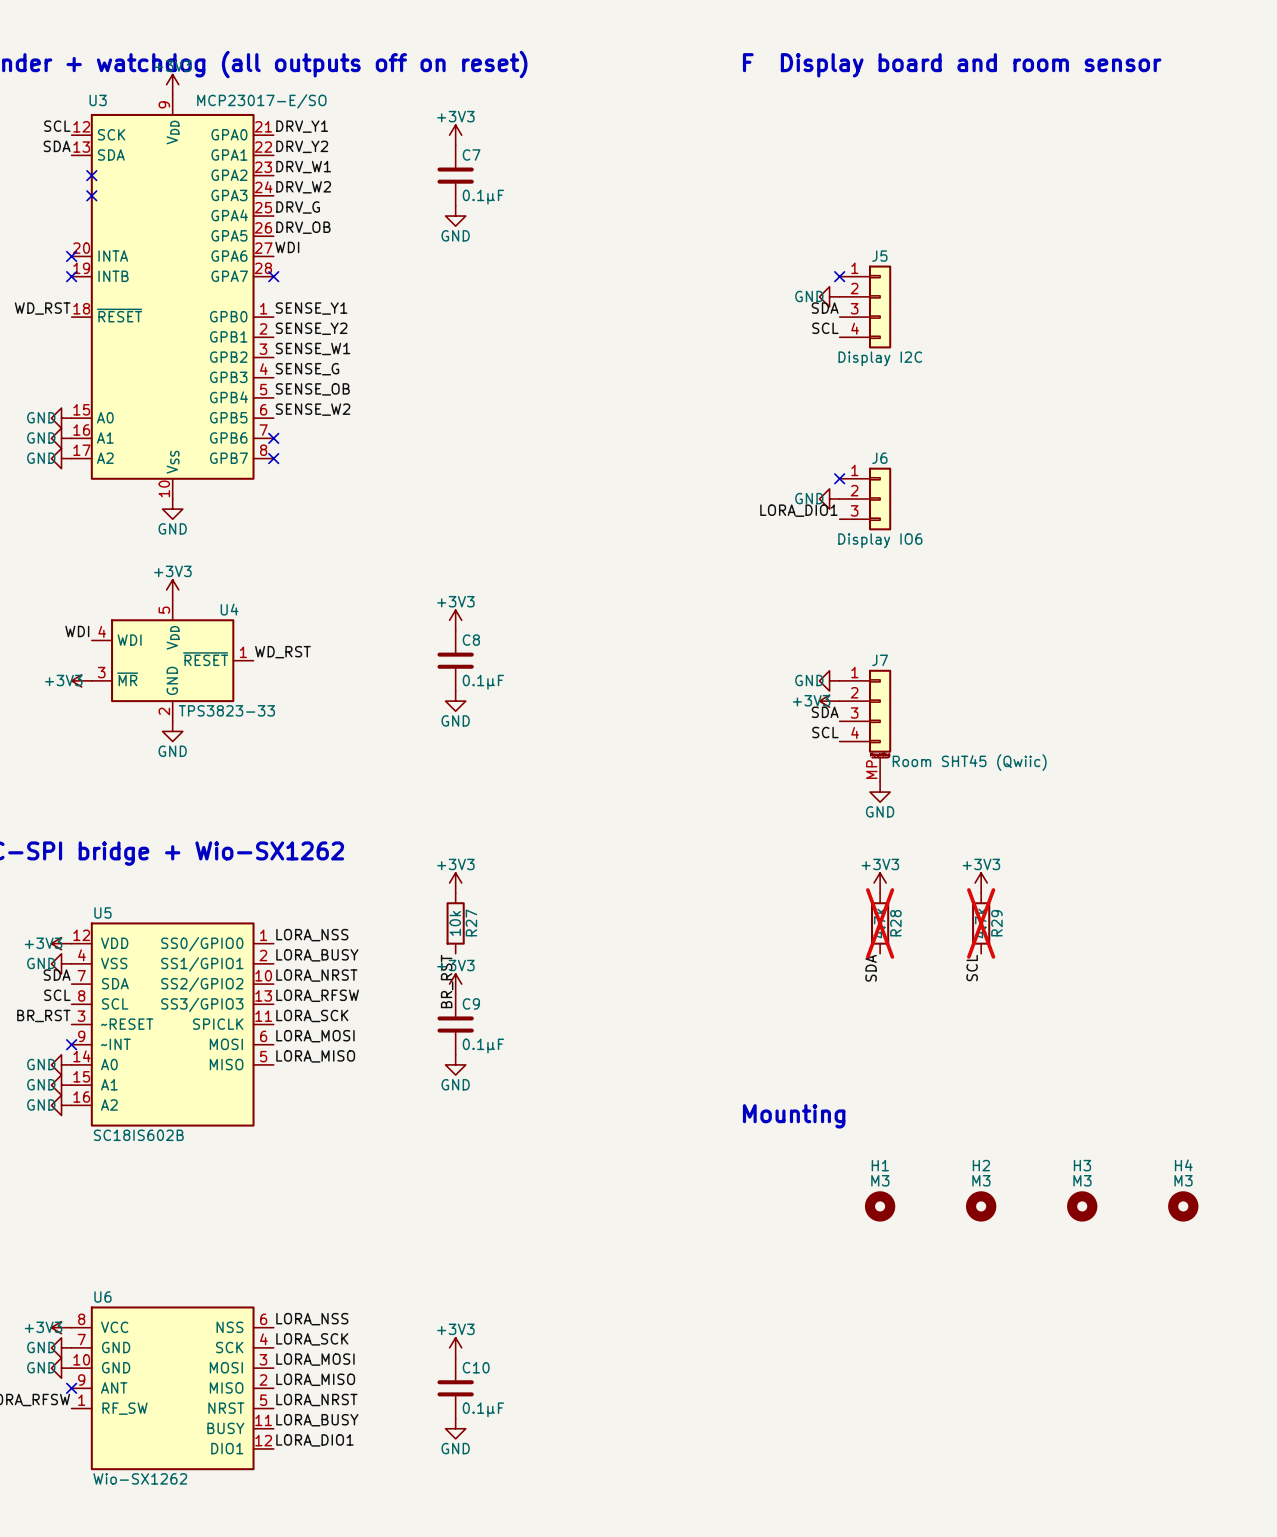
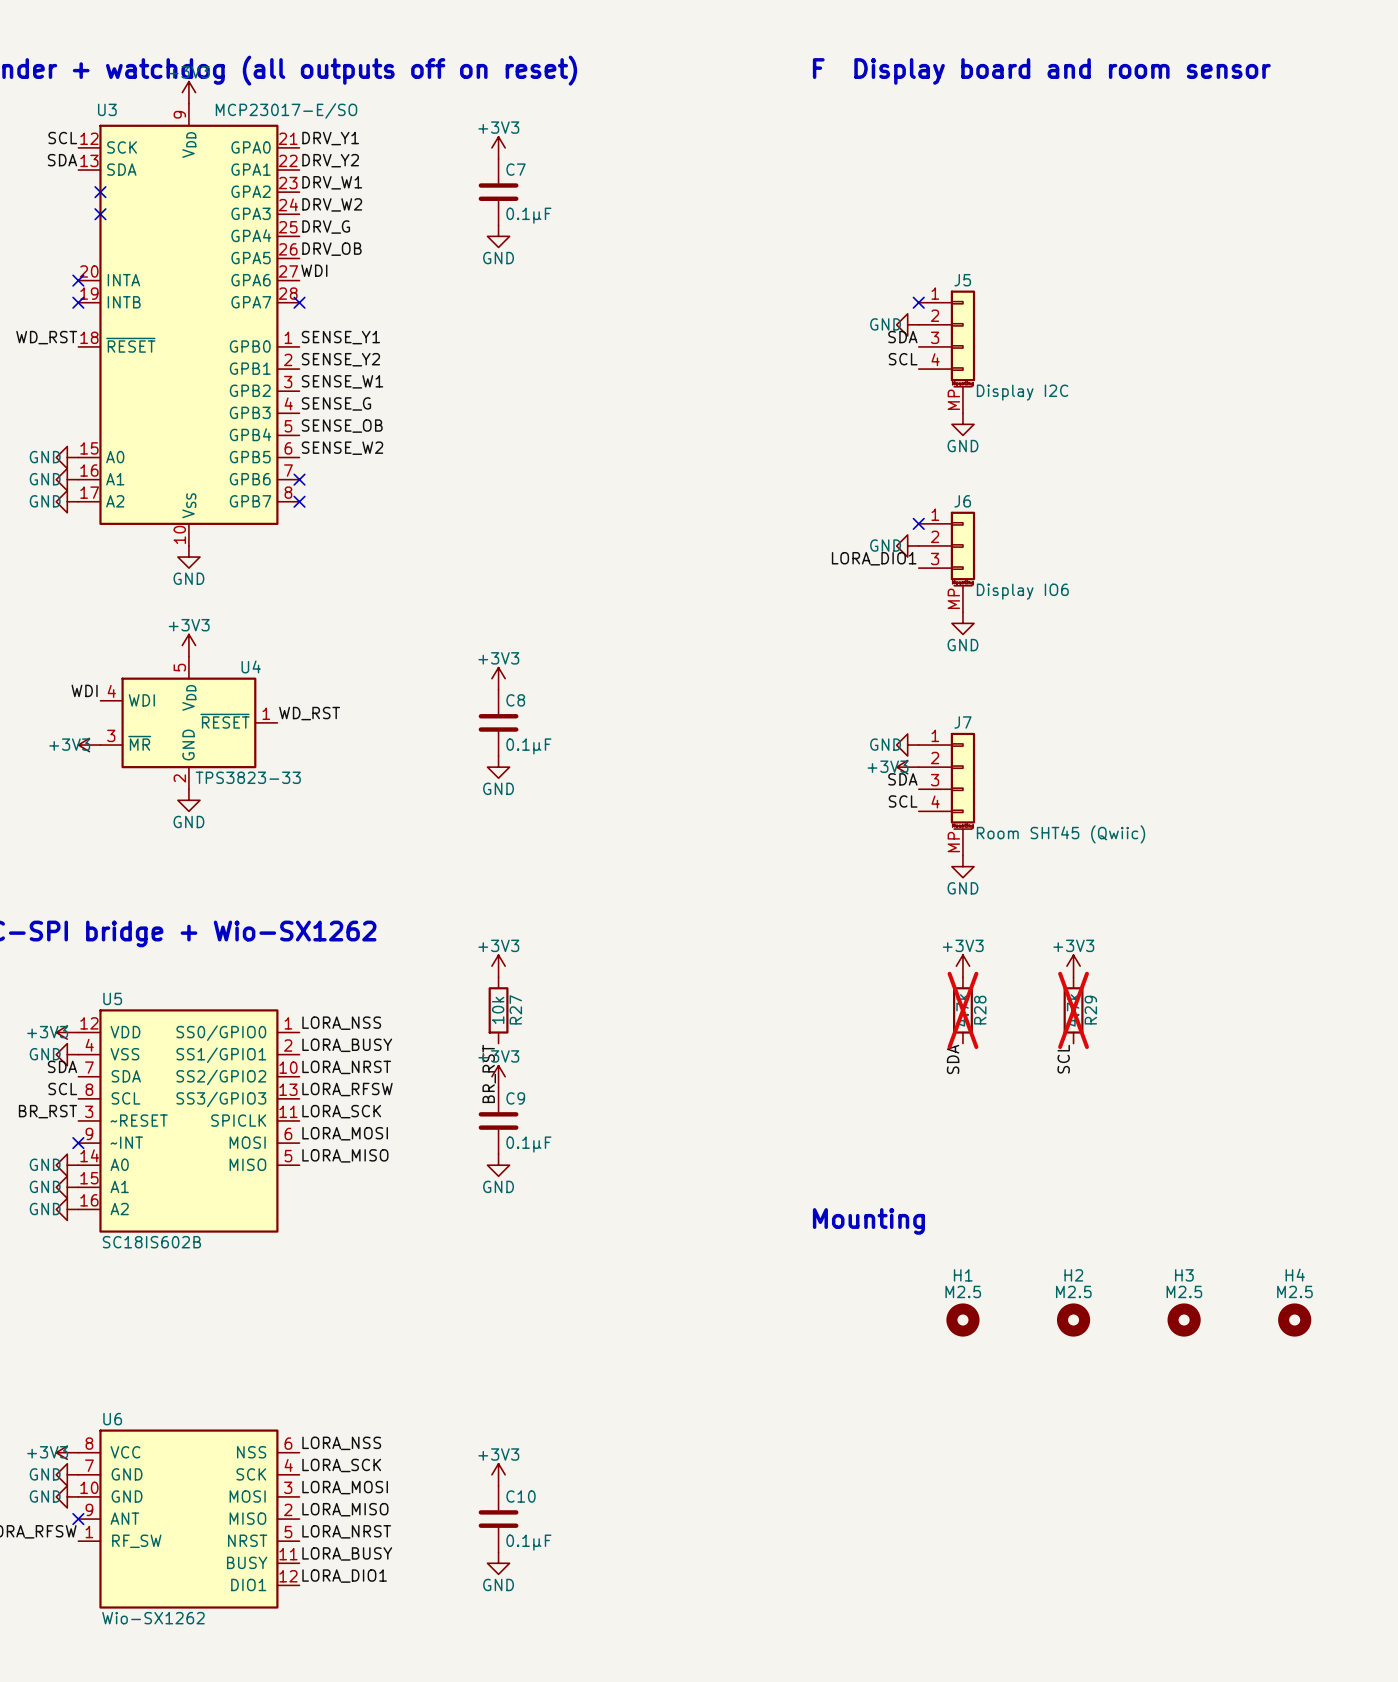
J5 symbol: [839, 265, 892, 349] -> [918, 290, 976, 414]
J5 value position: Display I2C (880, 358) -> Display I2C (1022, 392)
power symbol: none -> GND (962, 424)
J6 symbol: [839, 467, 892, 531] -> [918, 511, 976, 613]
J6 value position: Display IO6 (880, 540) -> Display IO6 (1022, 591)
power symbol: none -> GND (962, 623)
H1 value: M3 (880, 1180) -> M2.5 (963, 1291)
H2 value: M3 (981, 1180) -> M2.5 (1073, 1291)
H3 value: M3 (1082, 1180) -> M2.5 (1184, 1291)
H4 value: M3 (1183, 1180) -> M2.5 (1294, 1291)

